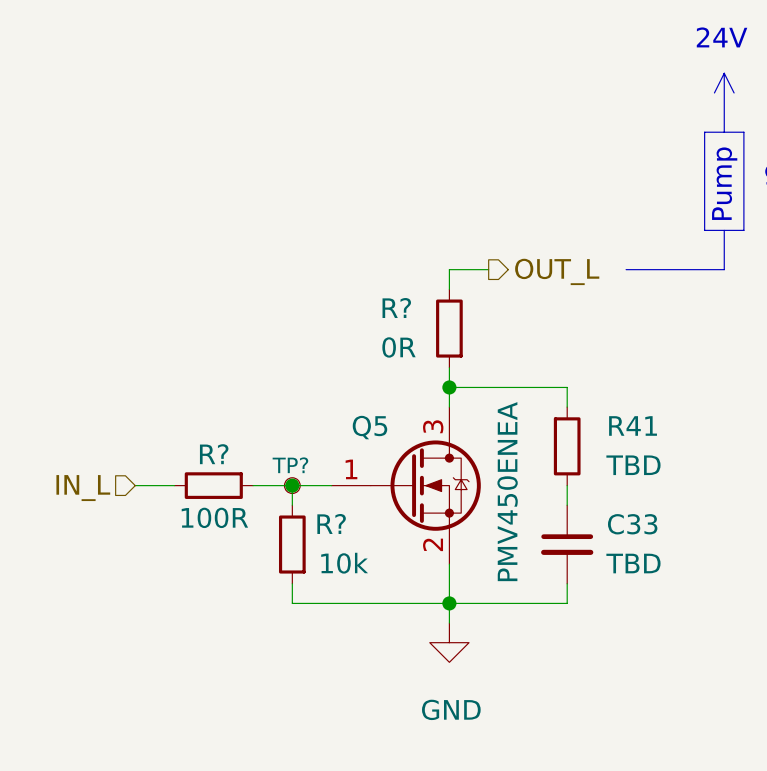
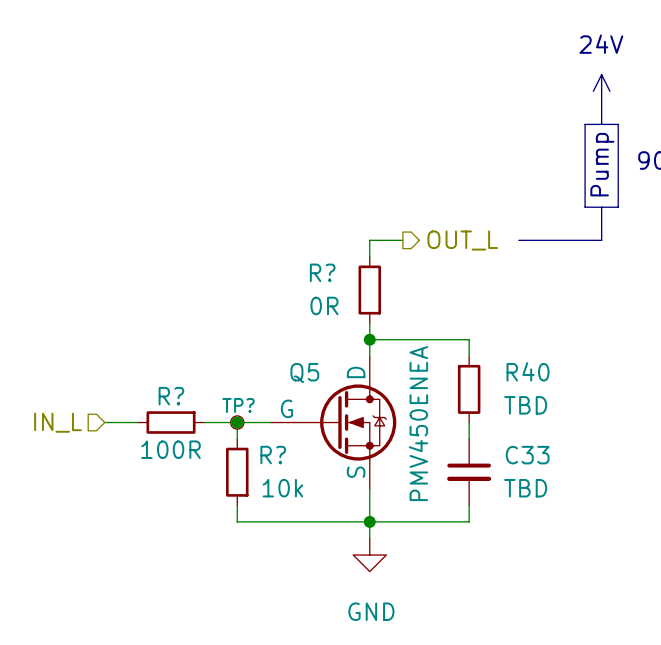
R41 name: R41 (633, 425) -> R40 (528, 371)
Q5 pin name: none -> D (356, 372)
Q5 pin number: 3 (433, 426) -> none
Q5 pin name: none -> G (286, 408)
Q5 pin number: 1 (351, 469) -> none
Q5 pin name: none -> S (356, 472)
Q5 pin number: 2 (433, 544) -> none

